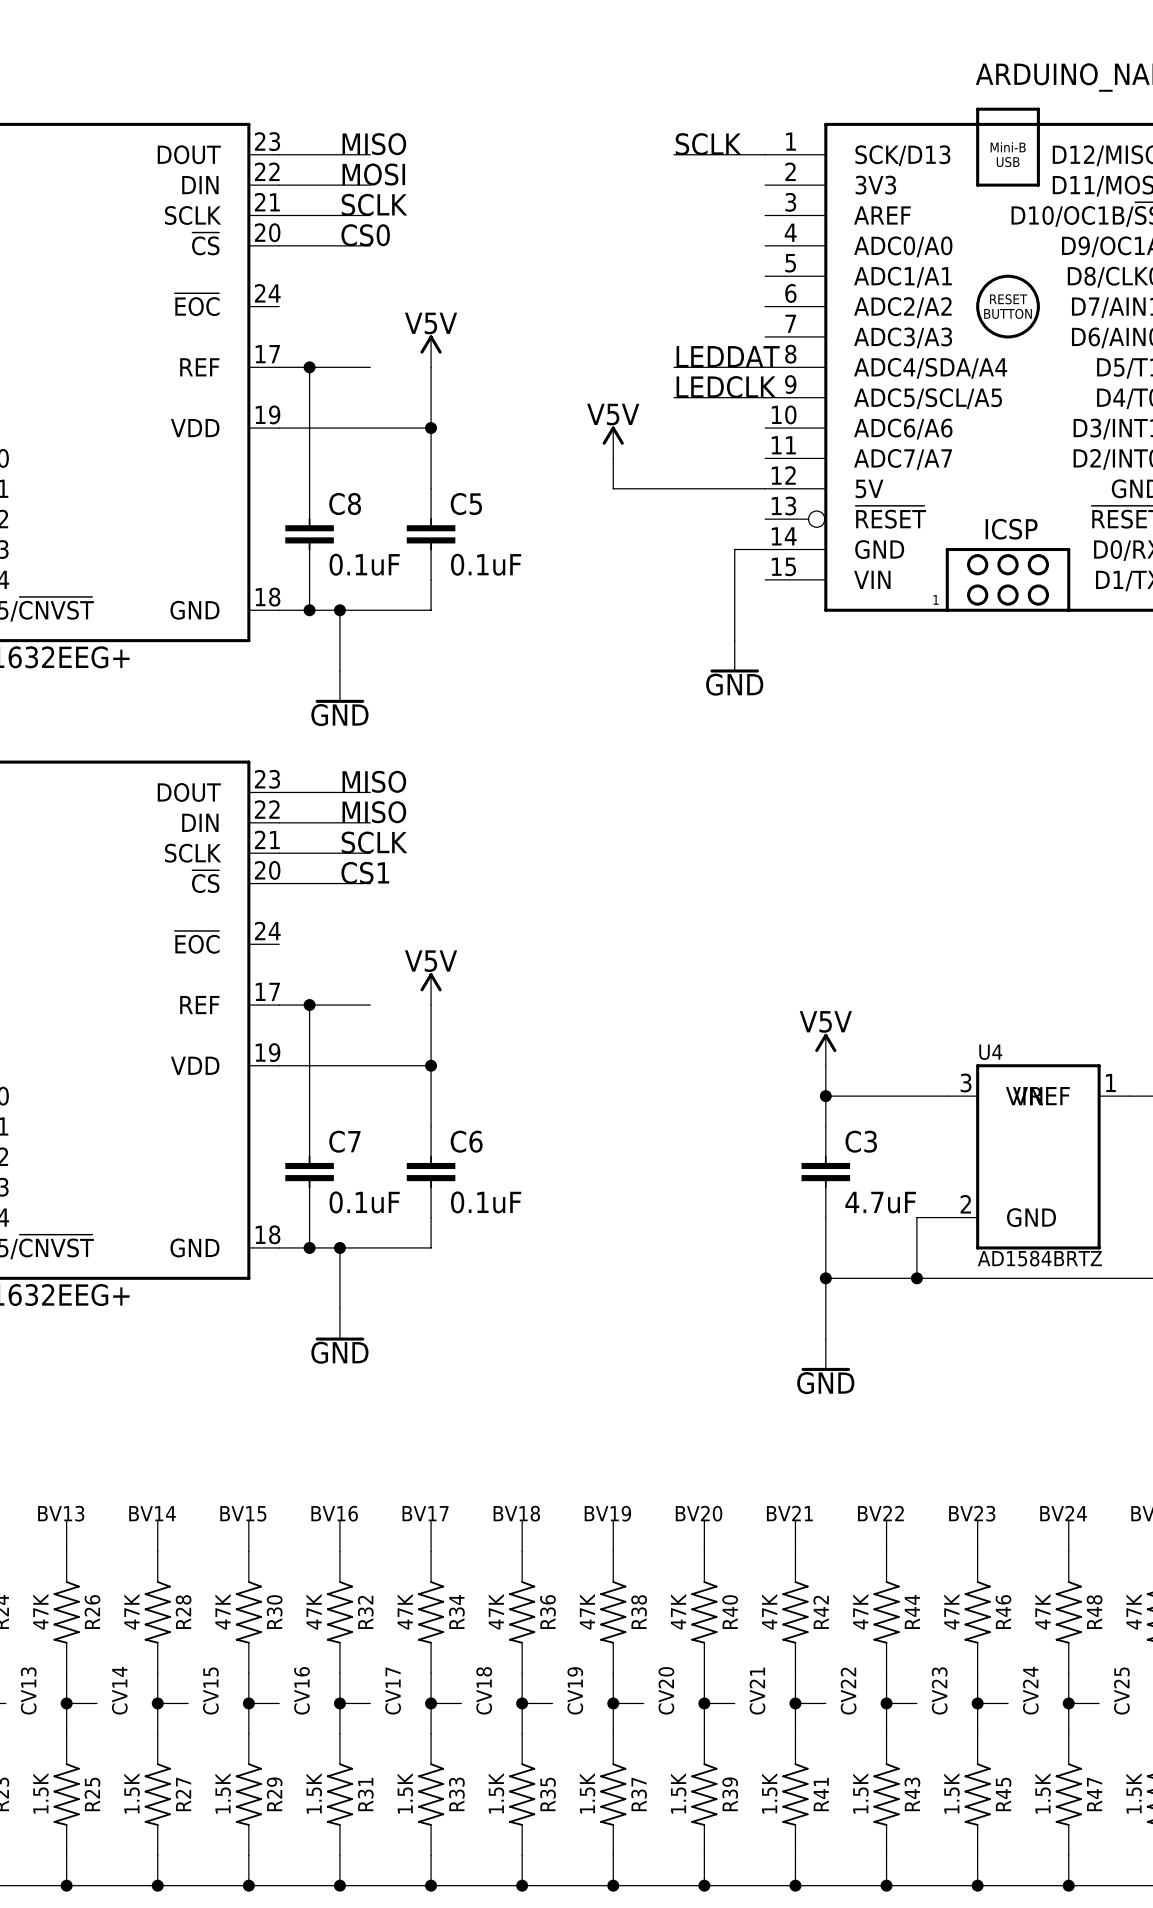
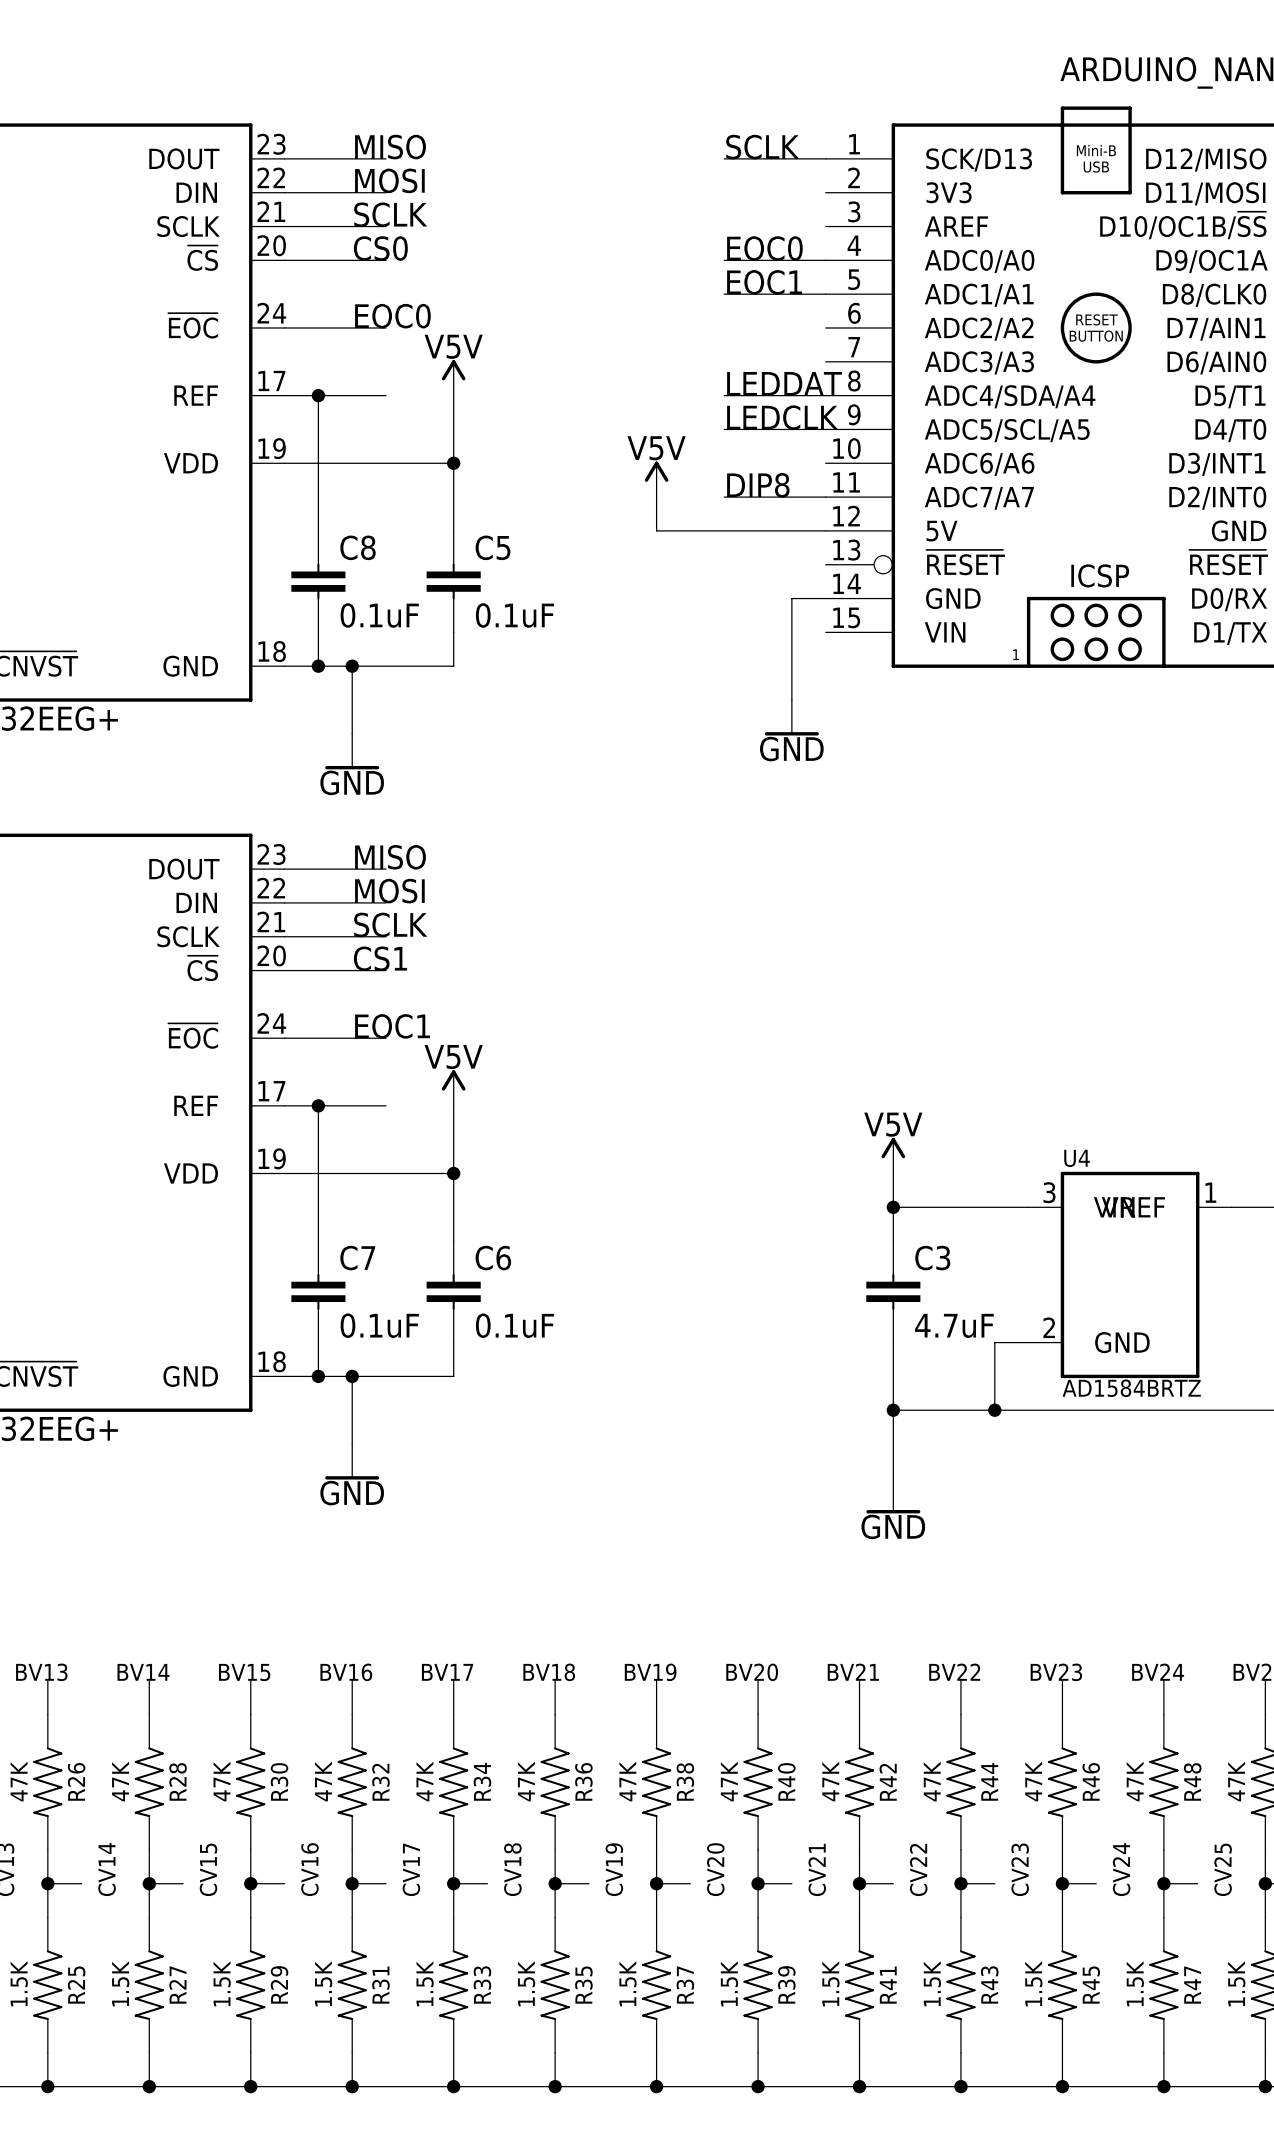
label: none -> EOC0 (764, 248)
wire: none -> (724, 260) (825, 260)
label: none -> EOC1 (764, 282)
wire: none -> (724, 294) (825, 294)
label: none -> EOC0 (392, 316)
wire: none -> (284, 327) (386, 327)
label: none -> DIP8 (758, 485)
wire: none -> (724, 497) (825, 497)
label: MISO (374, 812) -> MOSI (389, 891)
label: none -> EOC1 (392, 1026)
wire: none -> (284, 1038) (386, 1038)

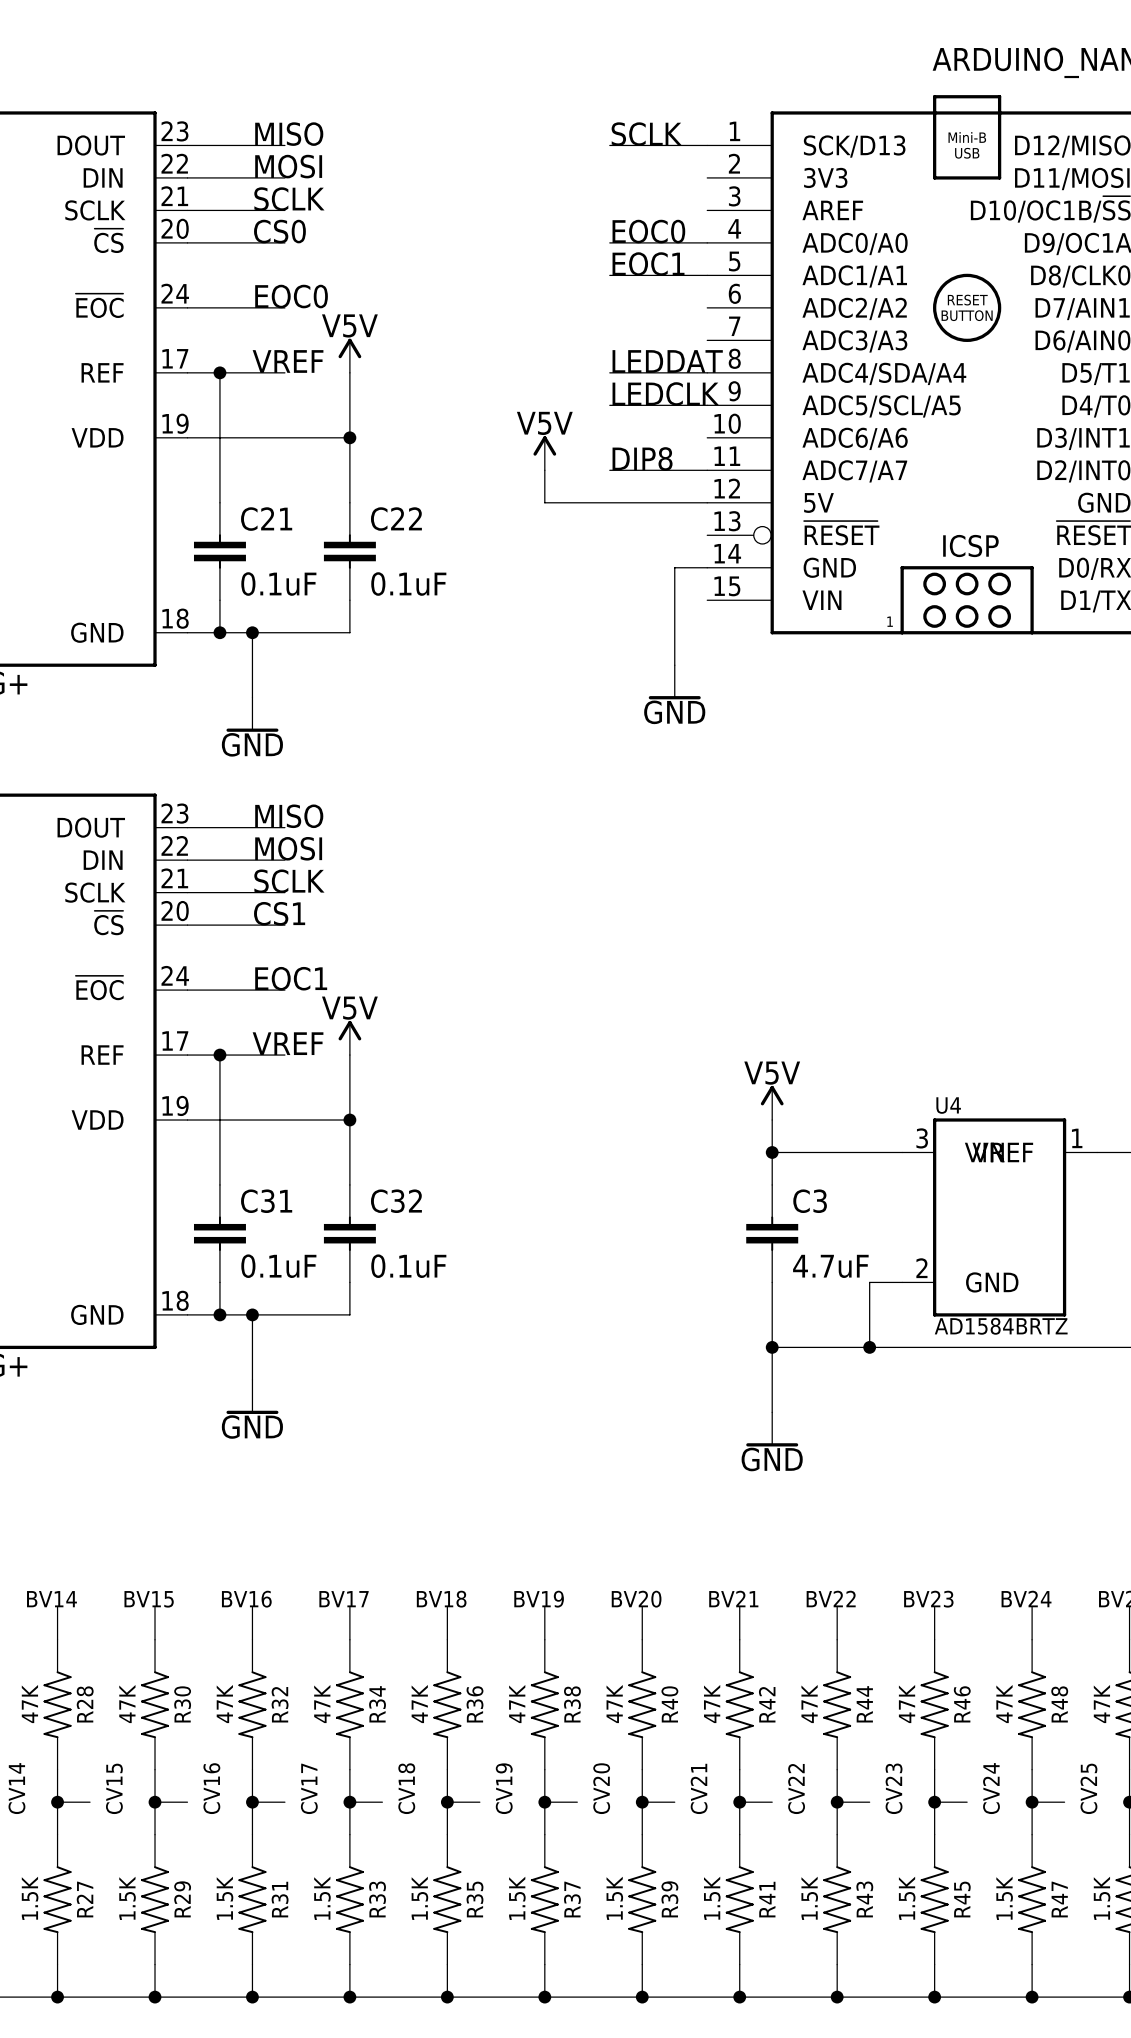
label: none -> VREF (288, 361)
C8 name: C8 (358, 547) -> C21 (266, 519)
C5 name: C5 (493, 547) -> C22 (396, 519)
label: none -> VREF (288, 1043)
C7 name: C7 (357, 1258) -> C31 (266, 1201)
C6 name: C6 (493, 1258) -> C32 (396, 1201)

